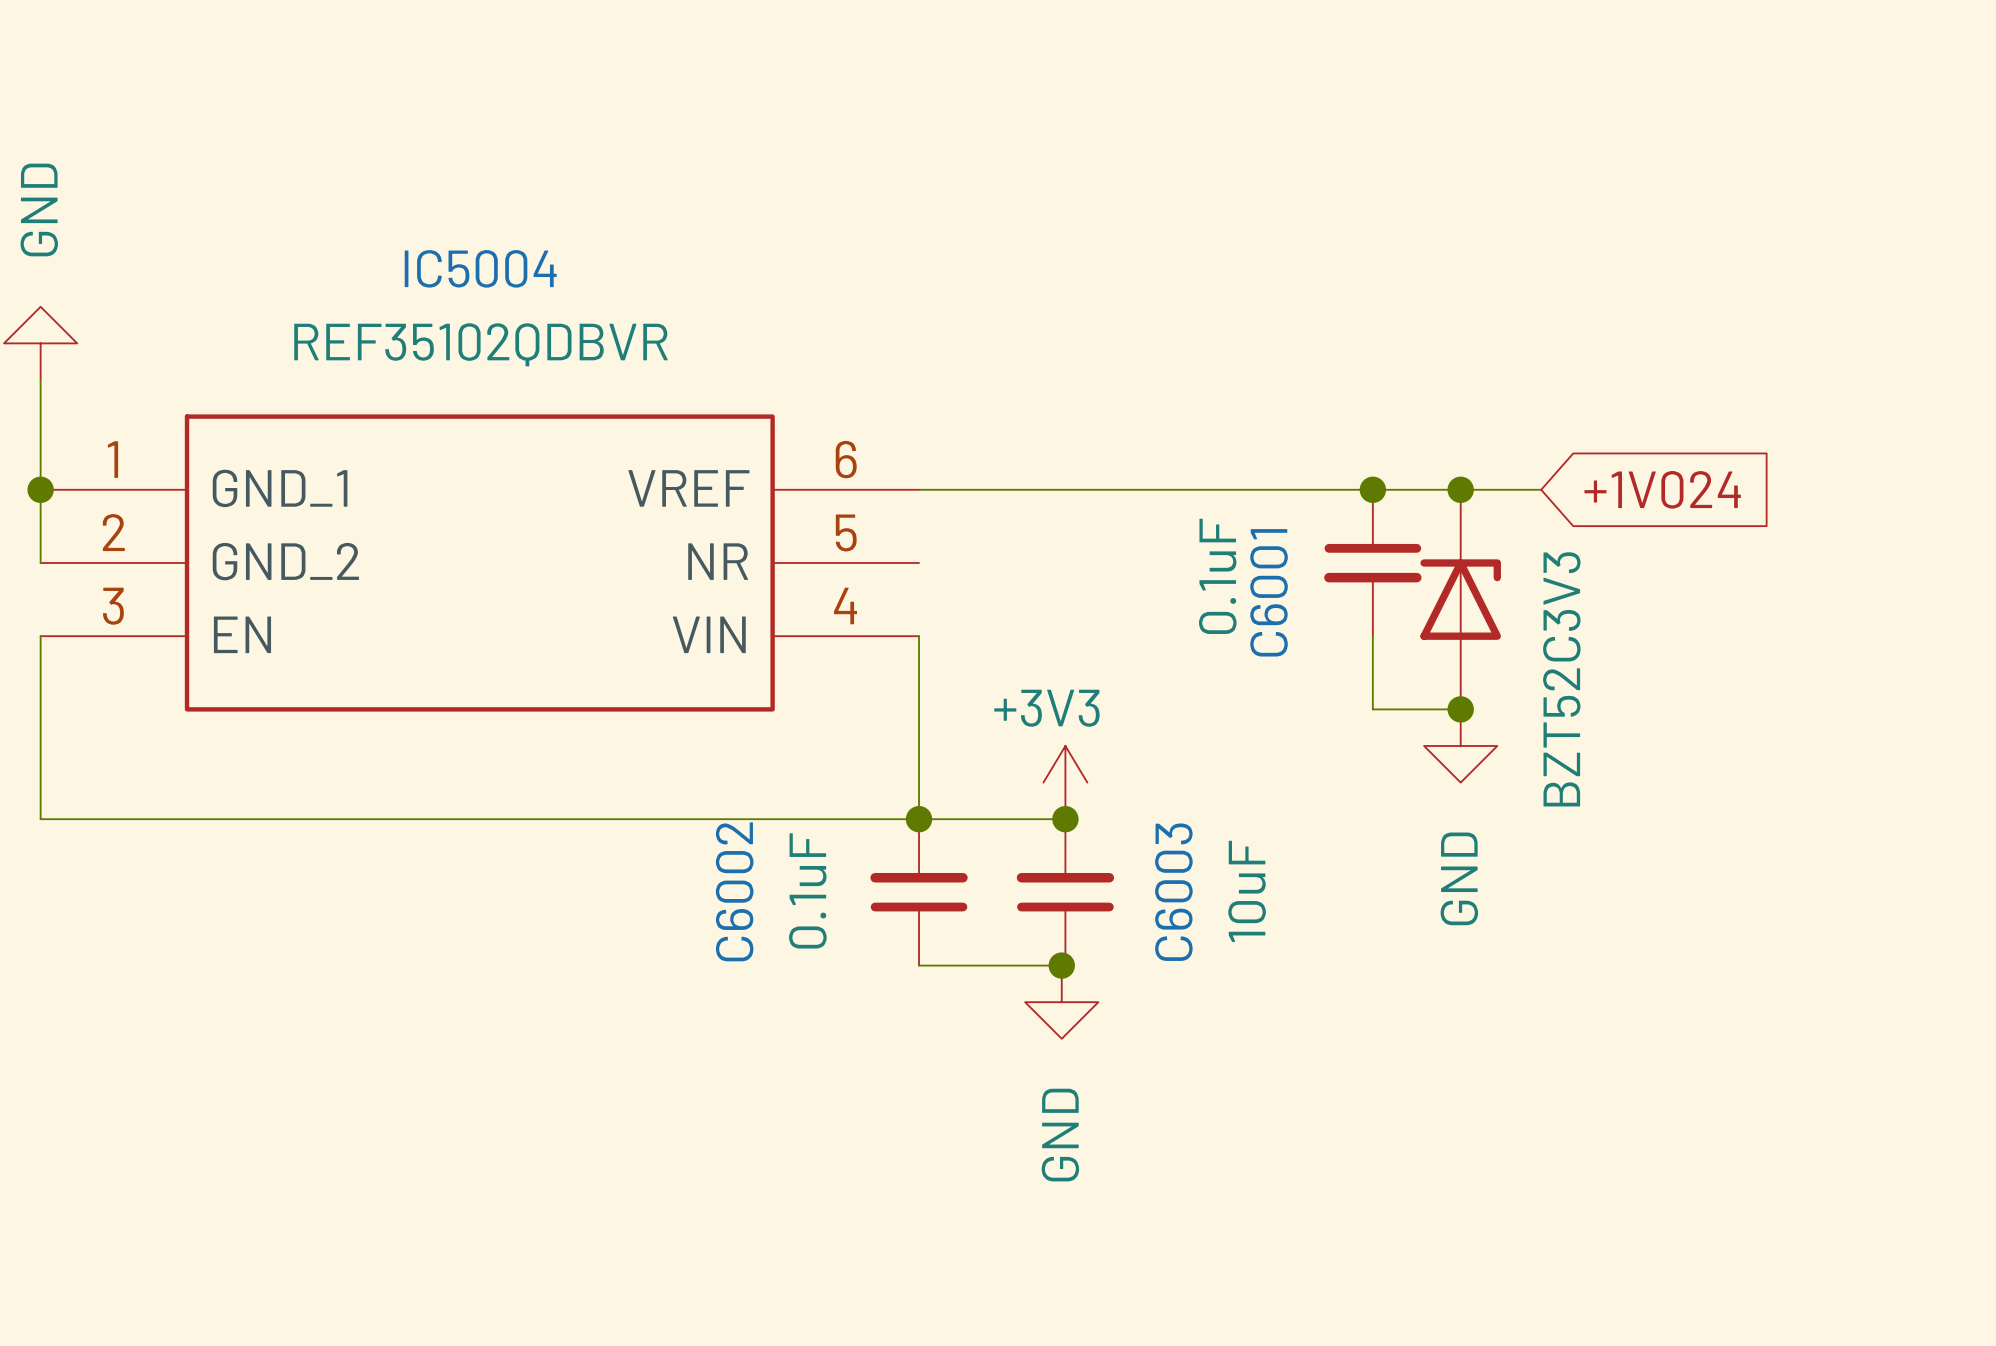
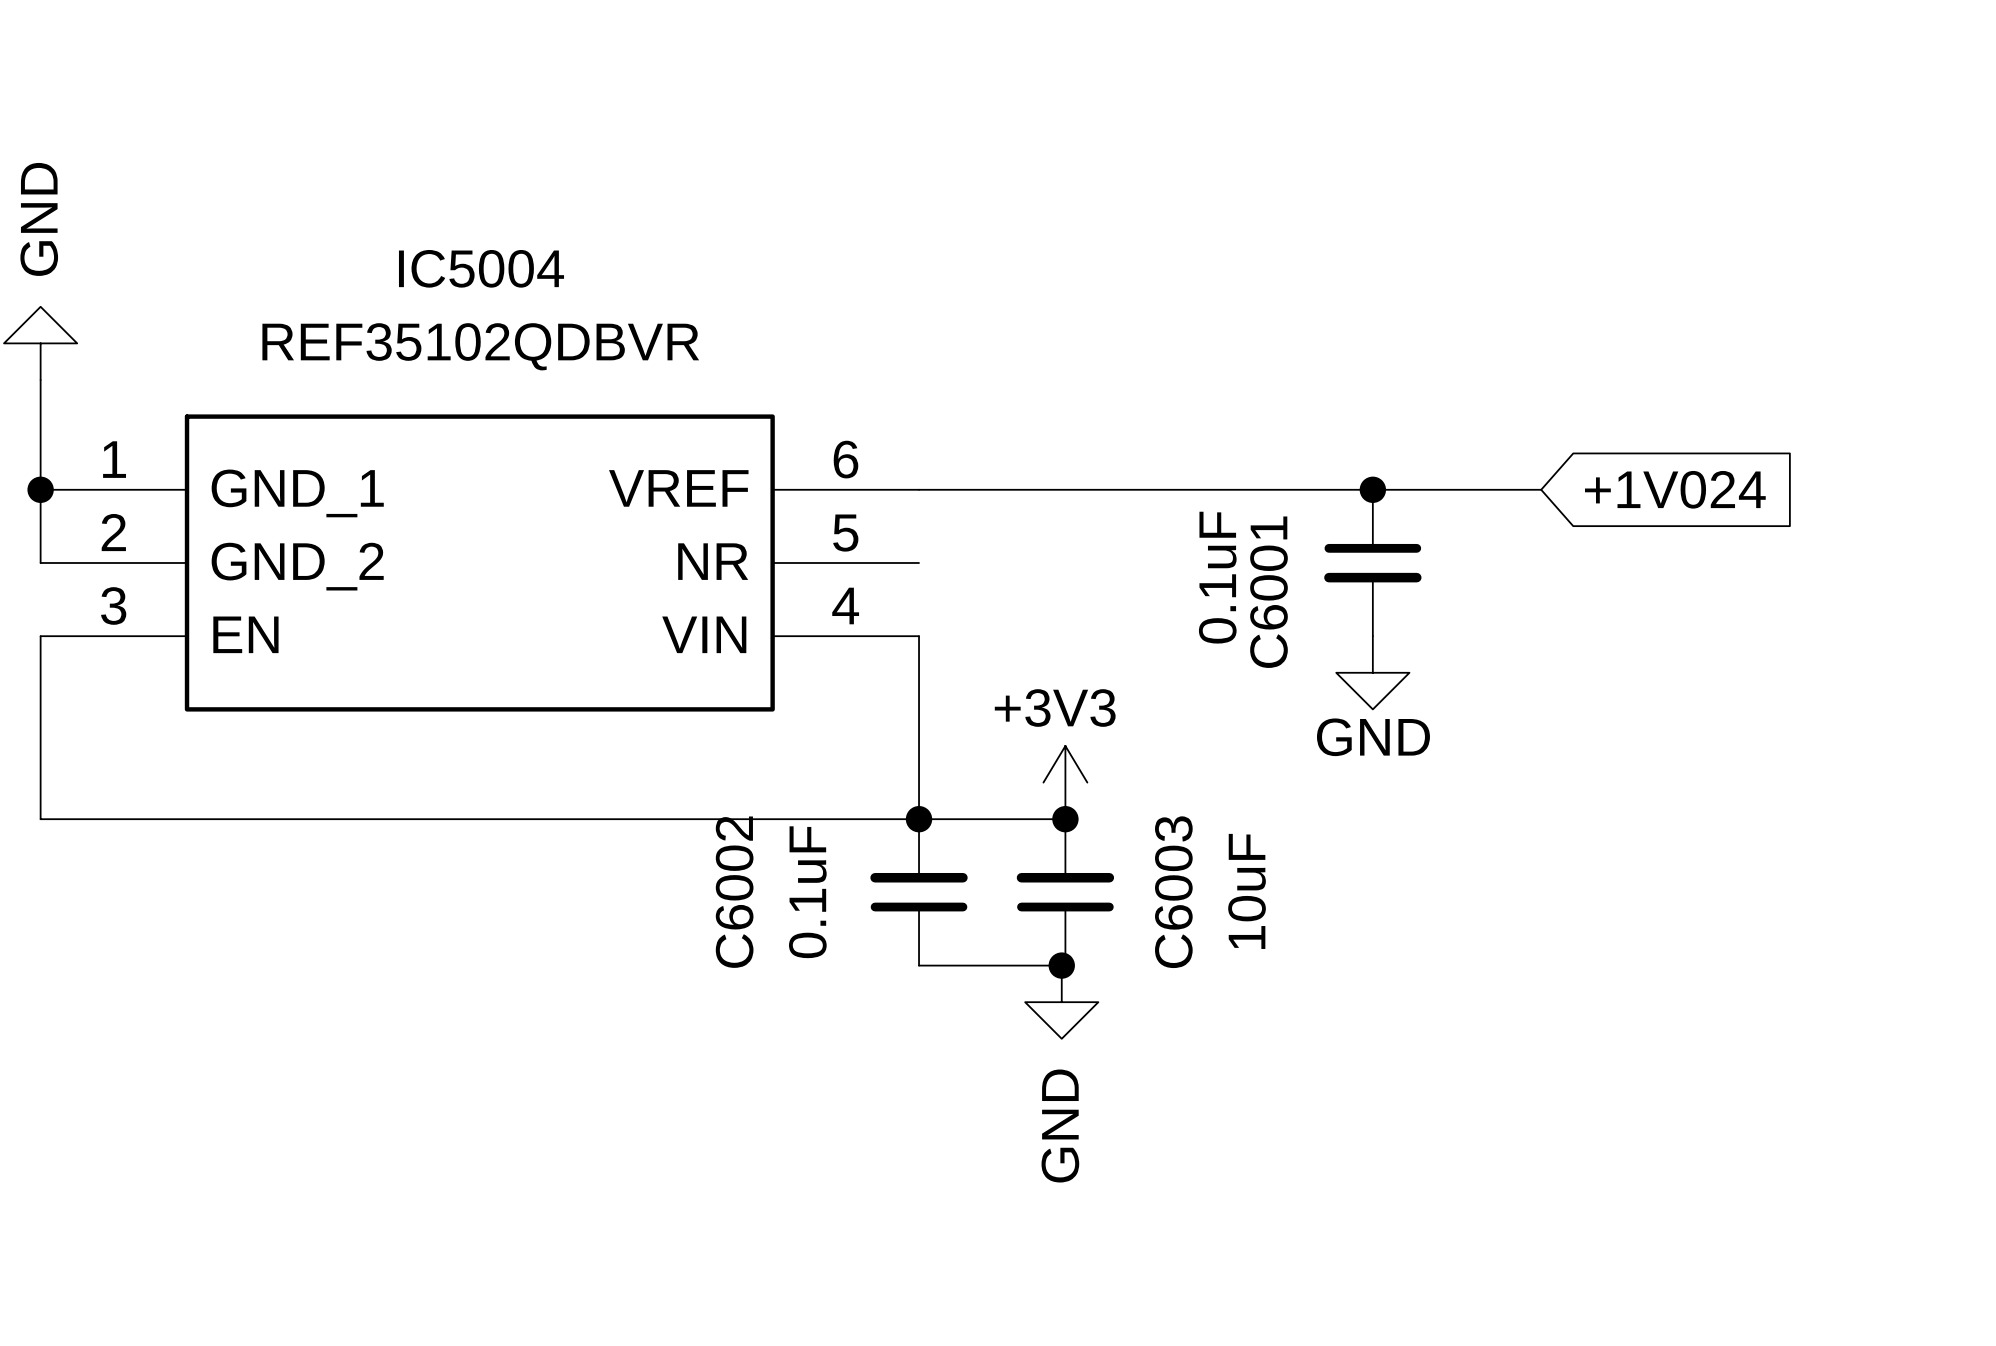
junction: (1460, 489) -> none
part: BZT52C3V3 (1460, 599) -> none
wire: (1372, 636) (1372, 709) (1460, 709) -> none
junction: (1460, 709) -> none
power symbol position: GND (1460, 745) -> GND (1372, 672)
power symbol text rotation: 0° (1459, 878) -> 90° clockwise (1373, 737)

